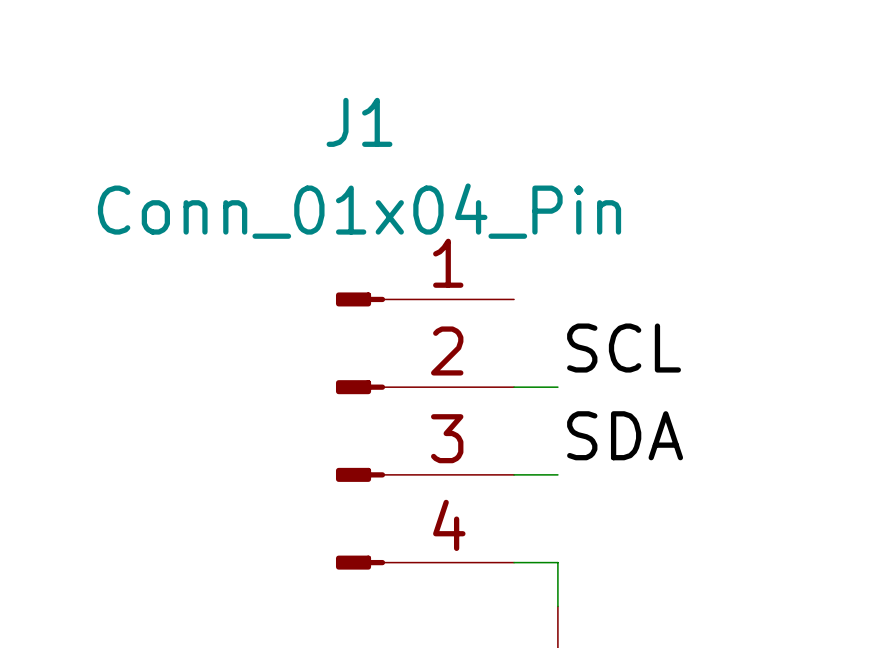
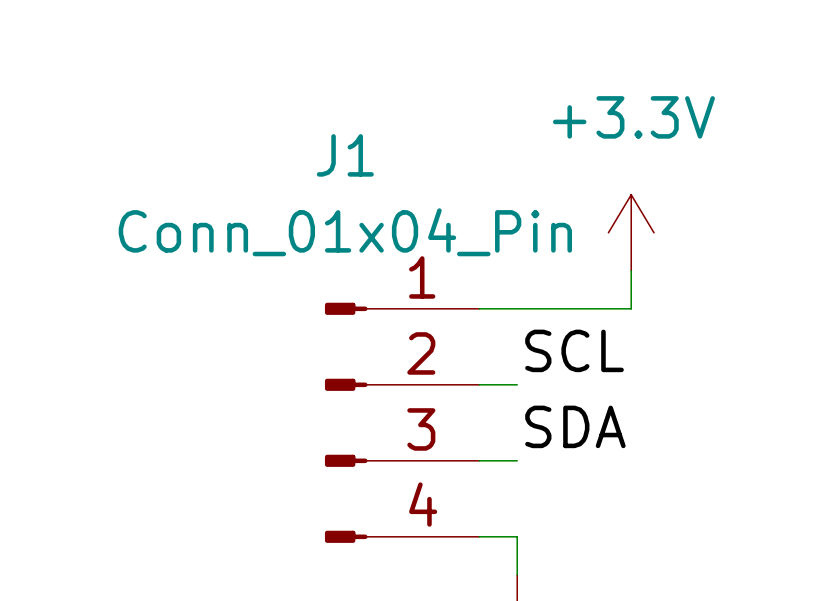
power symbol: none -> +3.3V (631, 232)
wire: none -> (631, 270) (631, 308) (479, 308)

